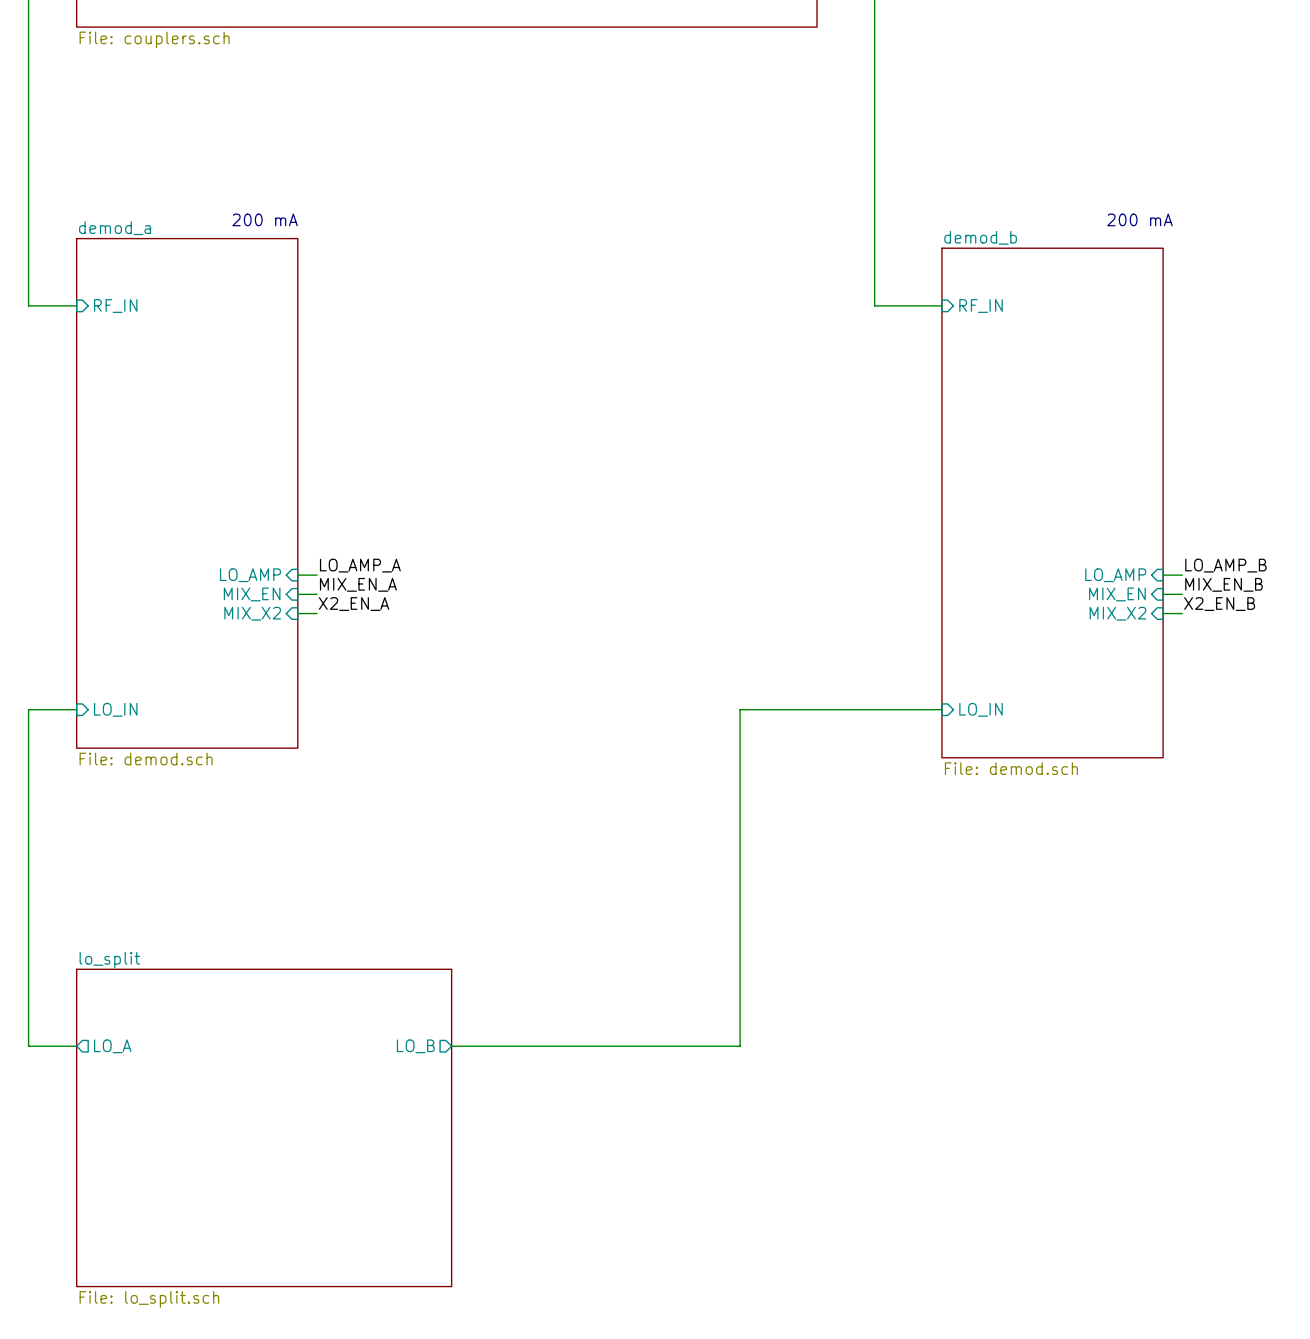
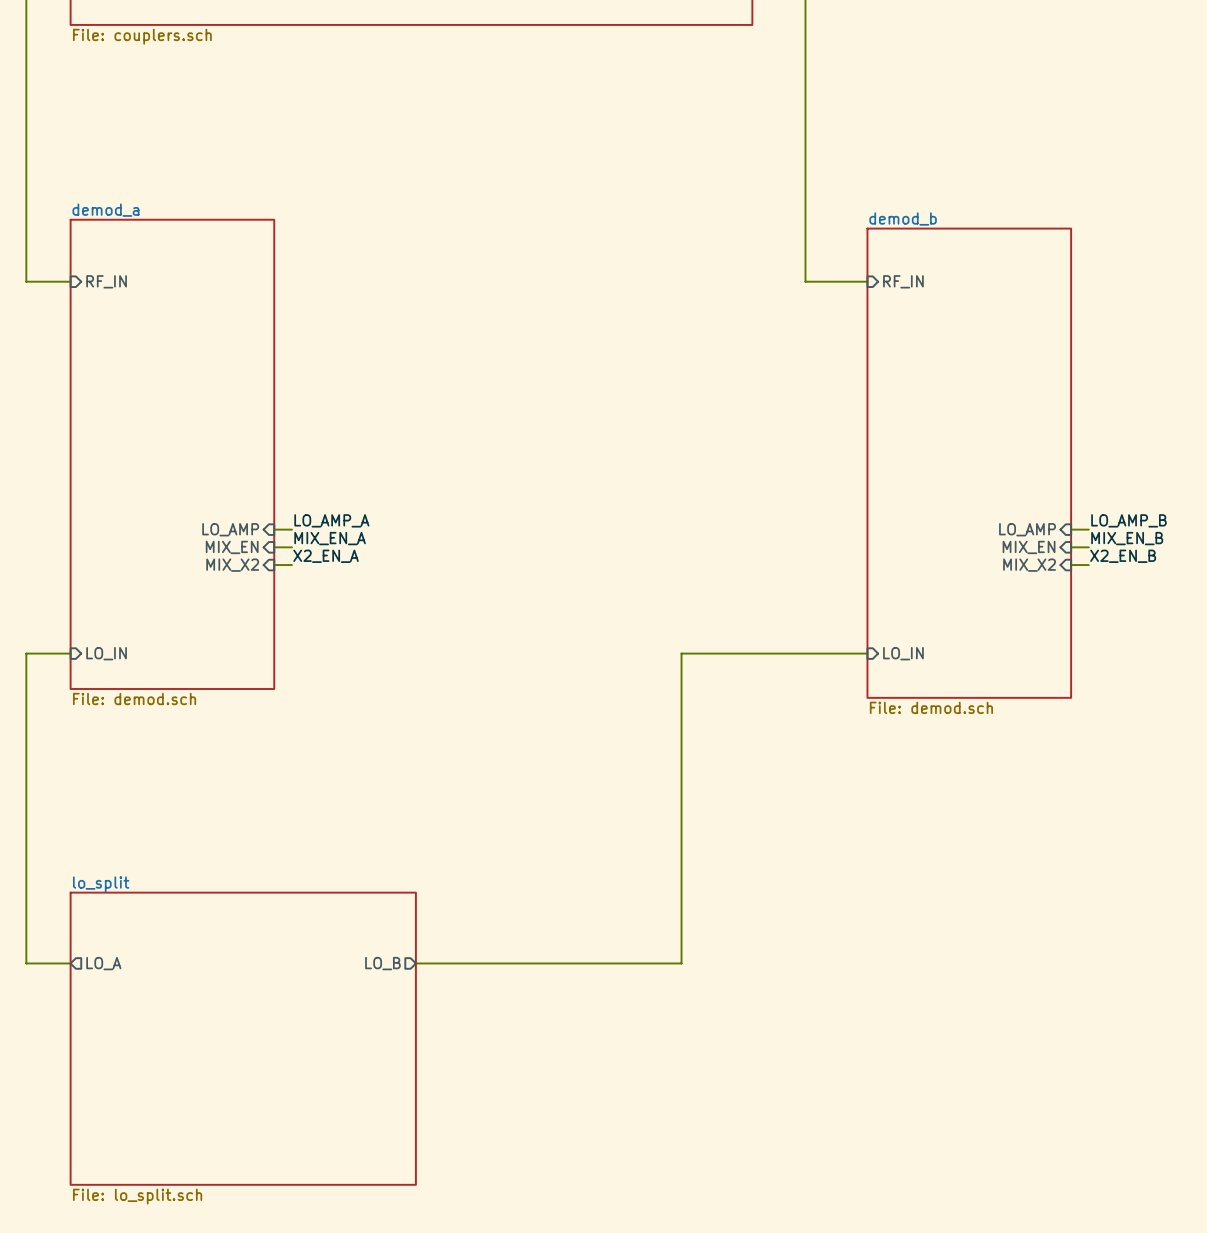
text: 200 mA (265, 219) -> none
text: 200 mA (1139, 219) -> none

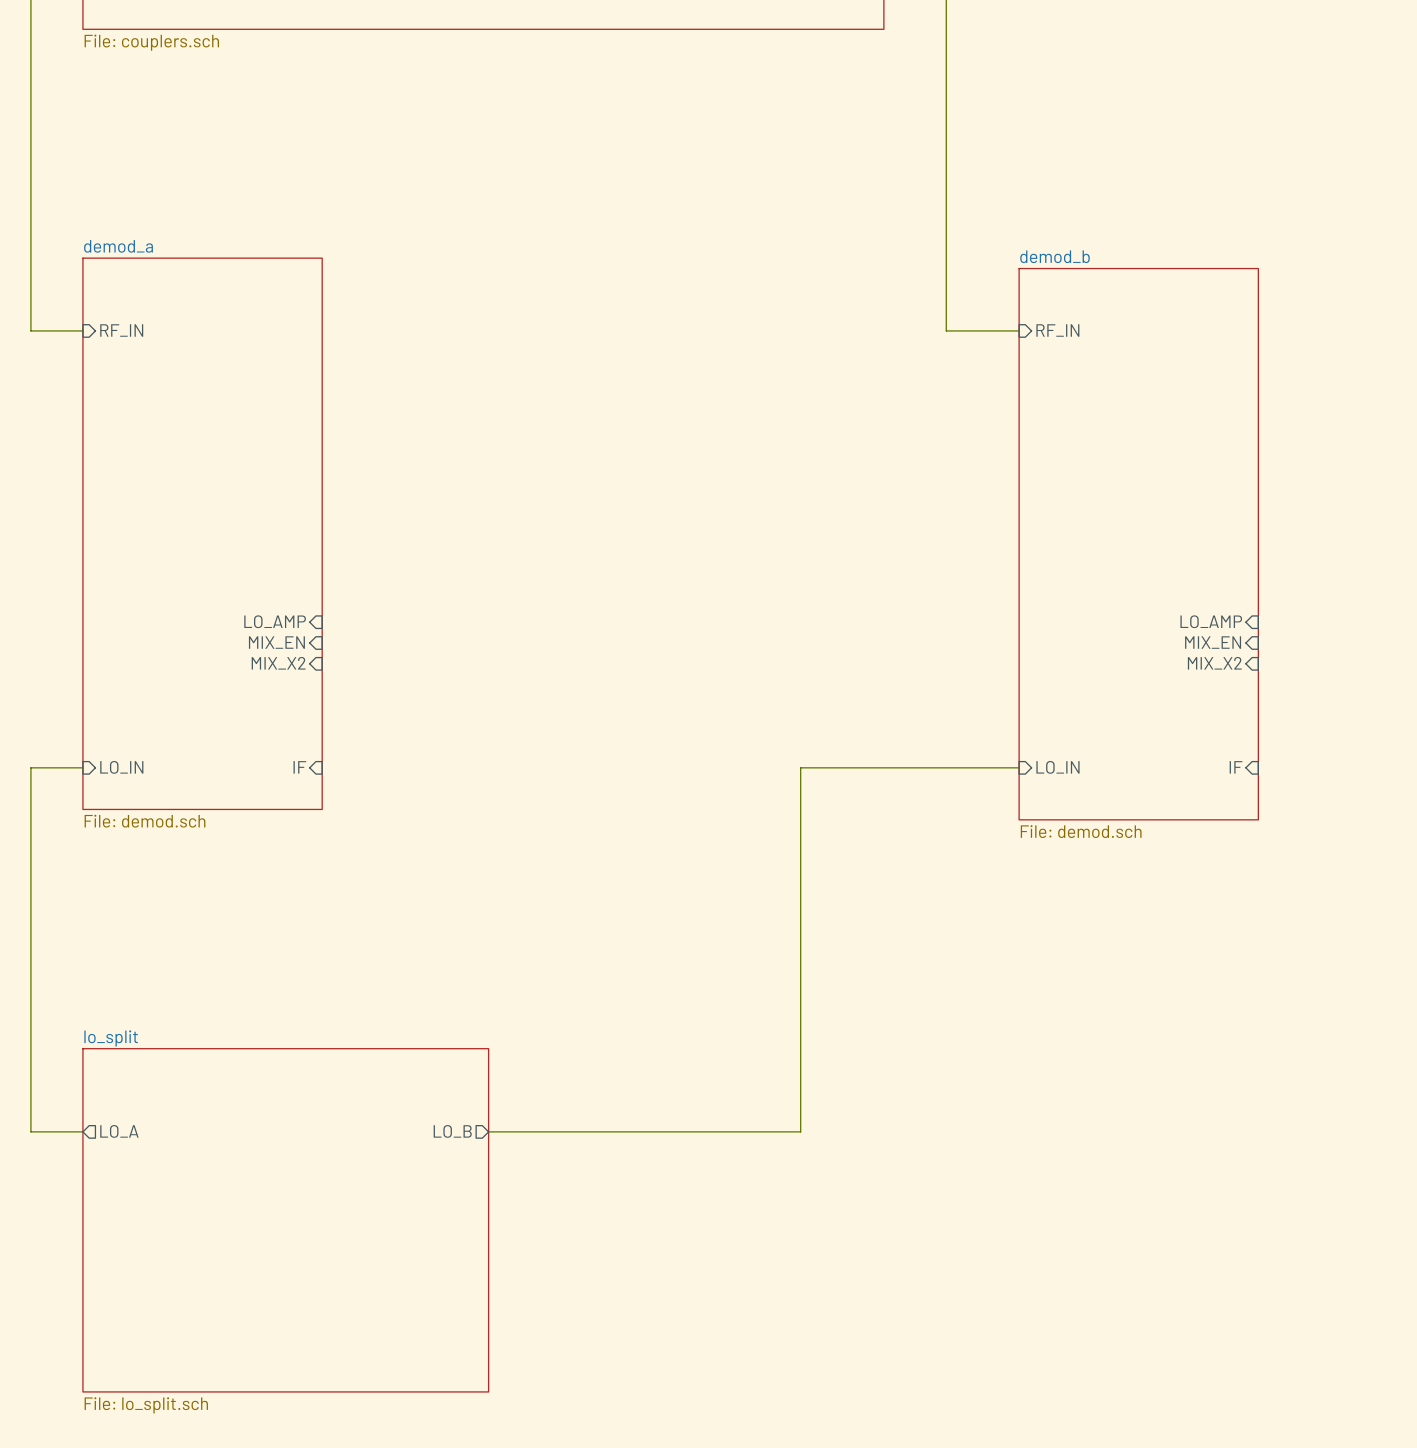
label: LO_AMP_A (331, 520) -> none
label: LO_AMP_B (1128, 520) -> none
wire: (274, 529) (291, 529) -> none
wire: (1071, 529) (1088, 529) -> none
label: MIX_EN_A (330, 538) -> none
label: MIX_EN_B (1127, 538) -> none
wire: (274, 547) (291, 547) -> none
wire: (1071, 547) (1088, 547) -> none
label: X2_EN_A (326, 556) -> none
label: X2_EN_B (1123, 556) -> none
wire: (274, 565) (291, 565) -> none
wire: (1071, 565) (1088, 565) -> none
sheet pin: none -> IF (299, 767)
sheet pin: none -> IF (1236, 767)

